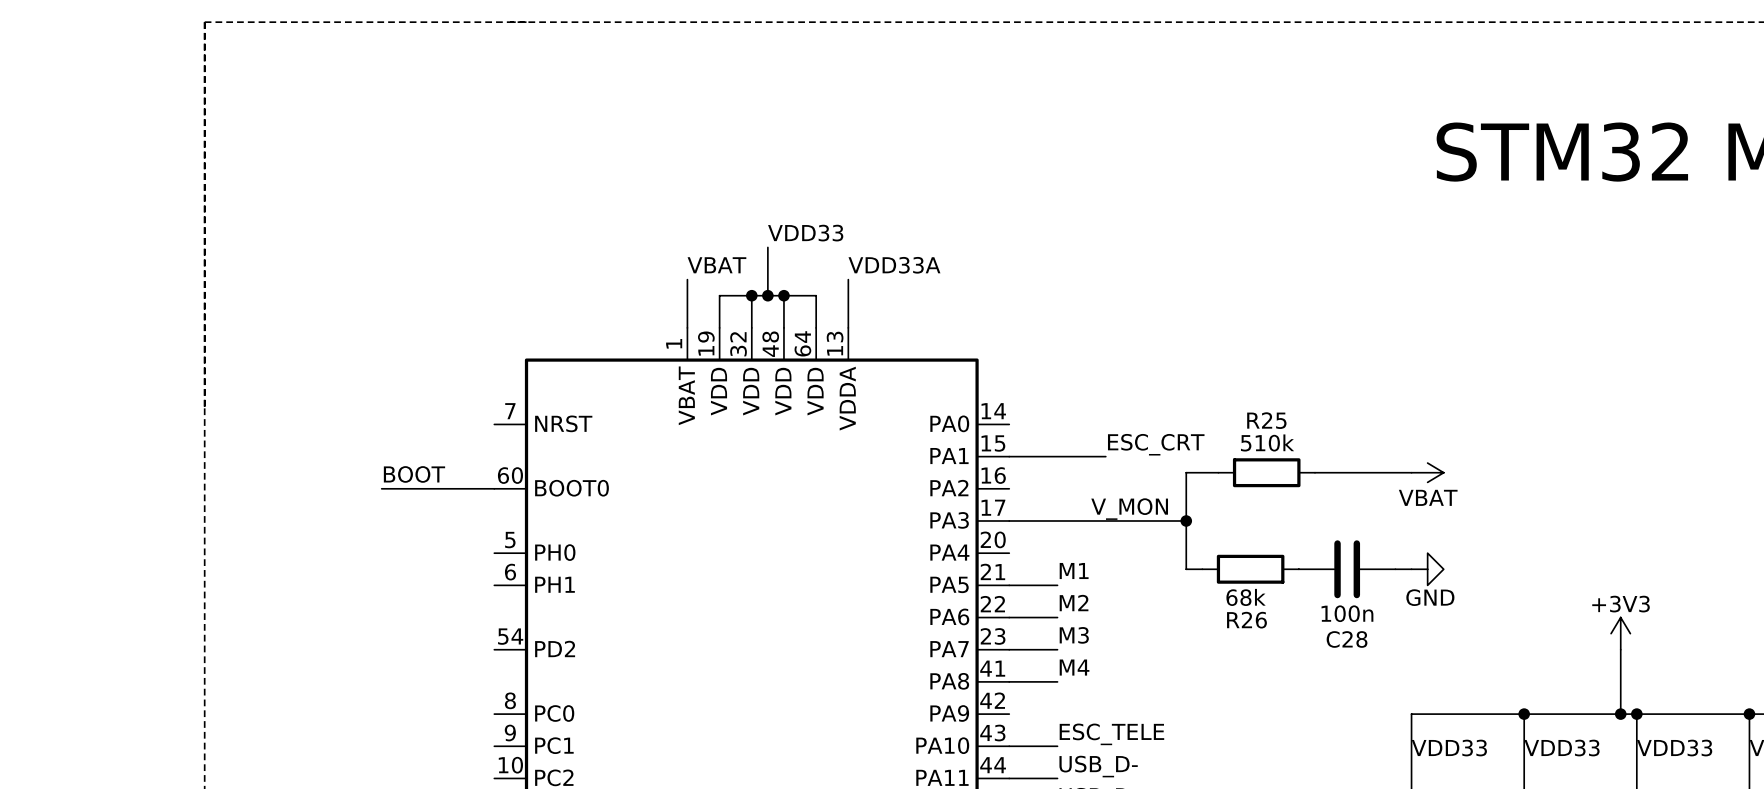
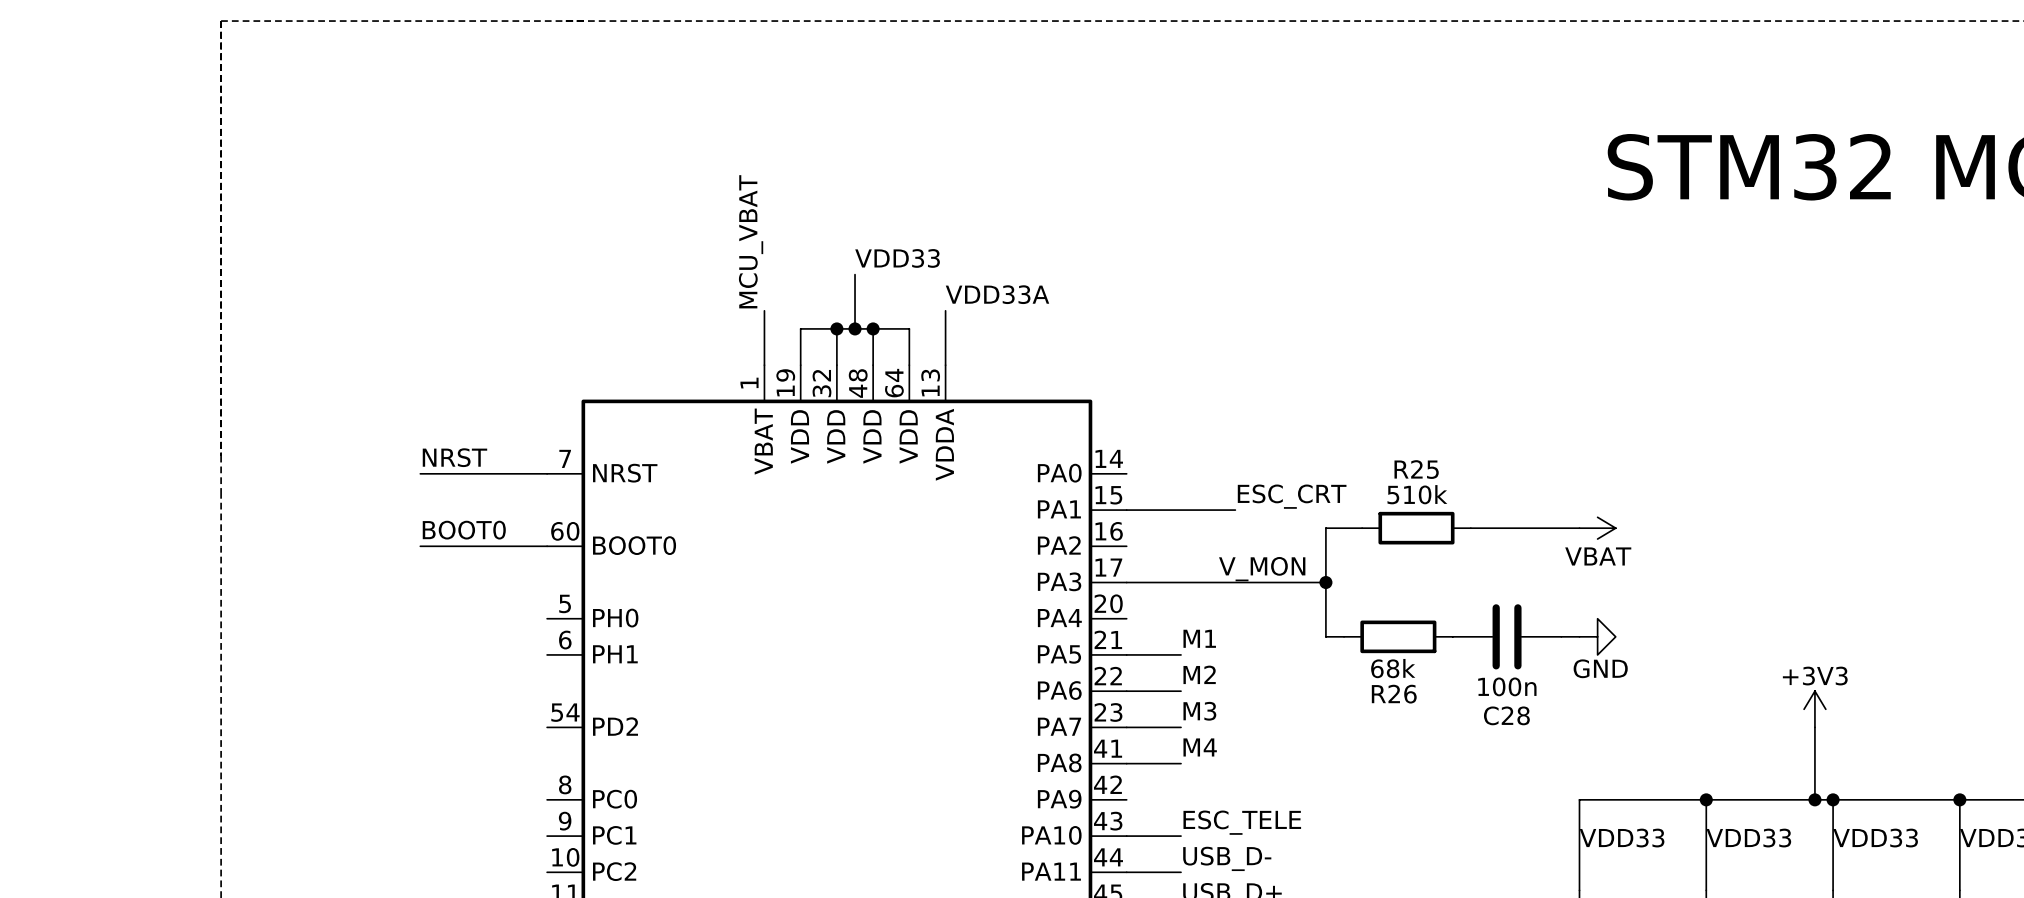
label: VBAT (716, 265) -> MCU_VBAT (751, 241)
label: none -> NRST (454, 457)
wire: none -> (420, 473) (547, 473)
label: BOOT (414, 474) -> BOOT0 (464, 530)

